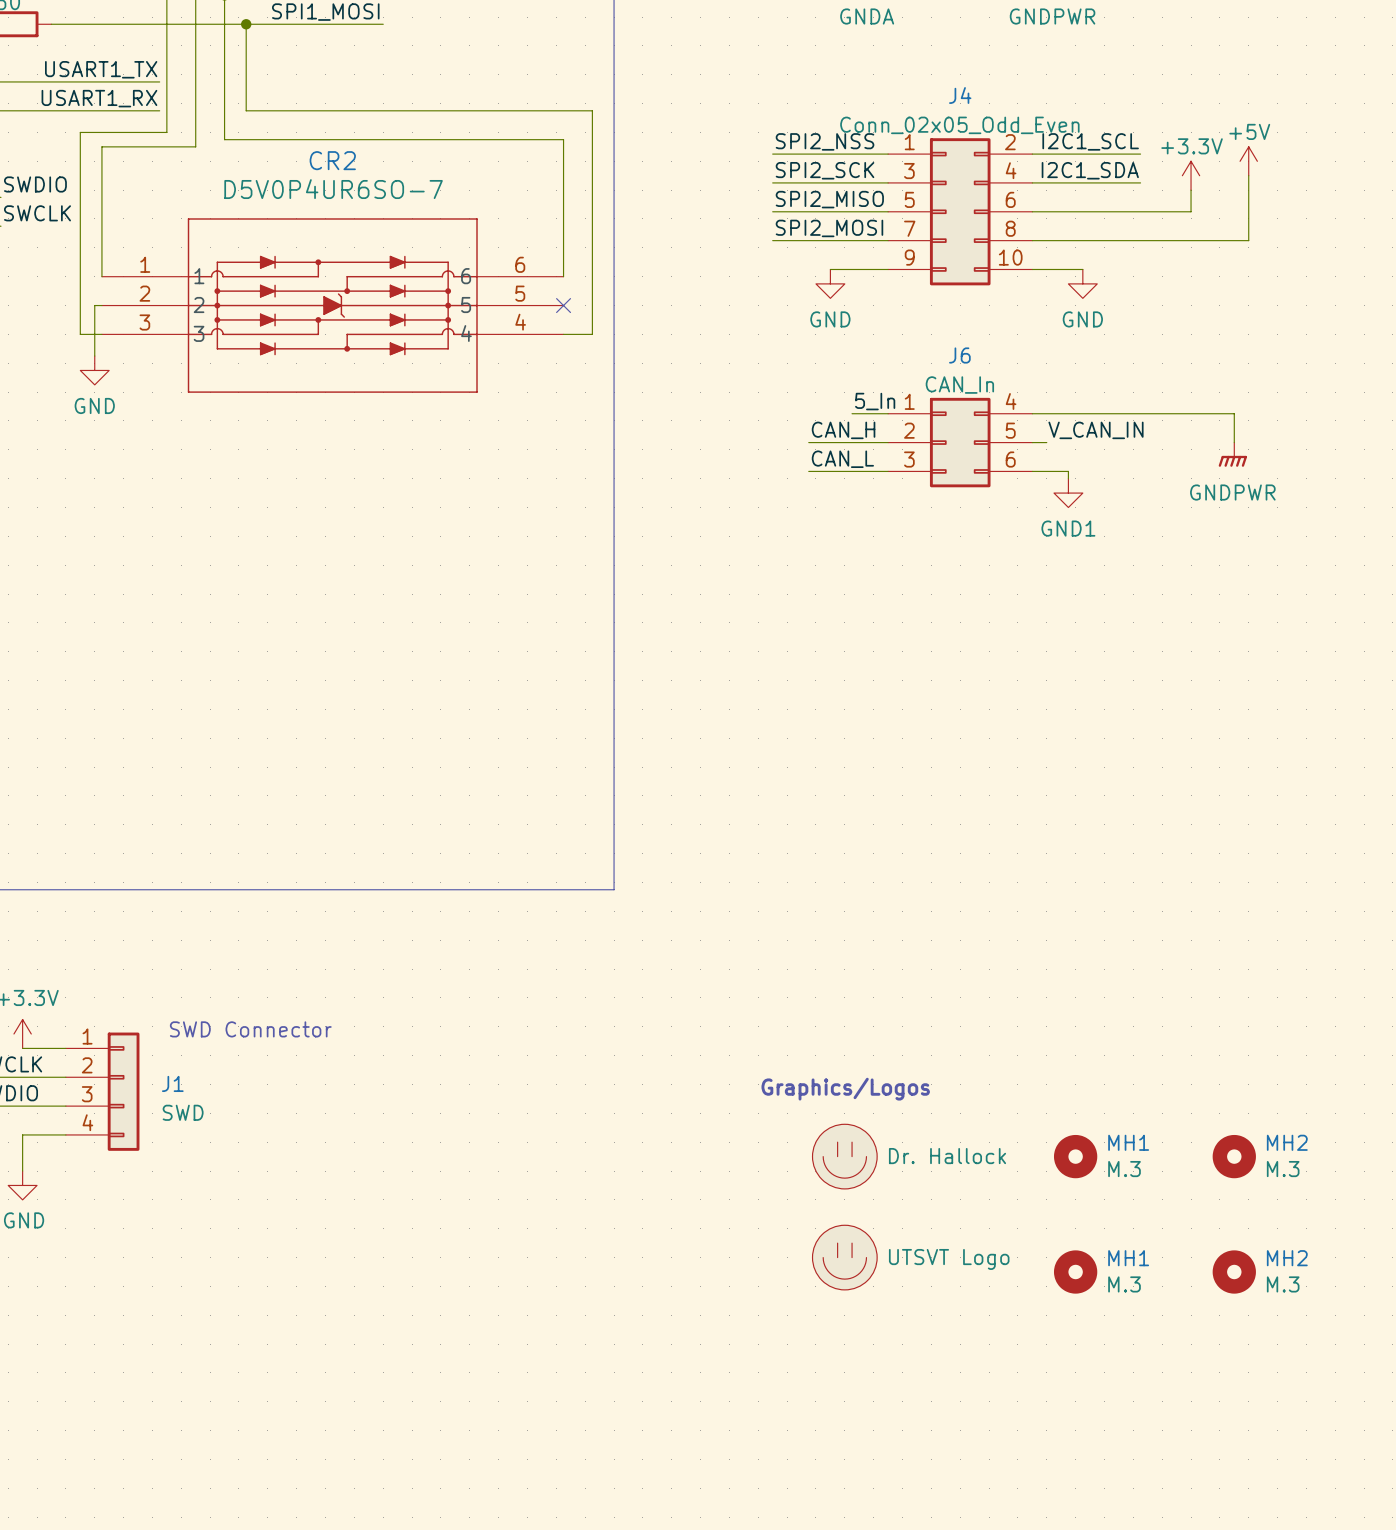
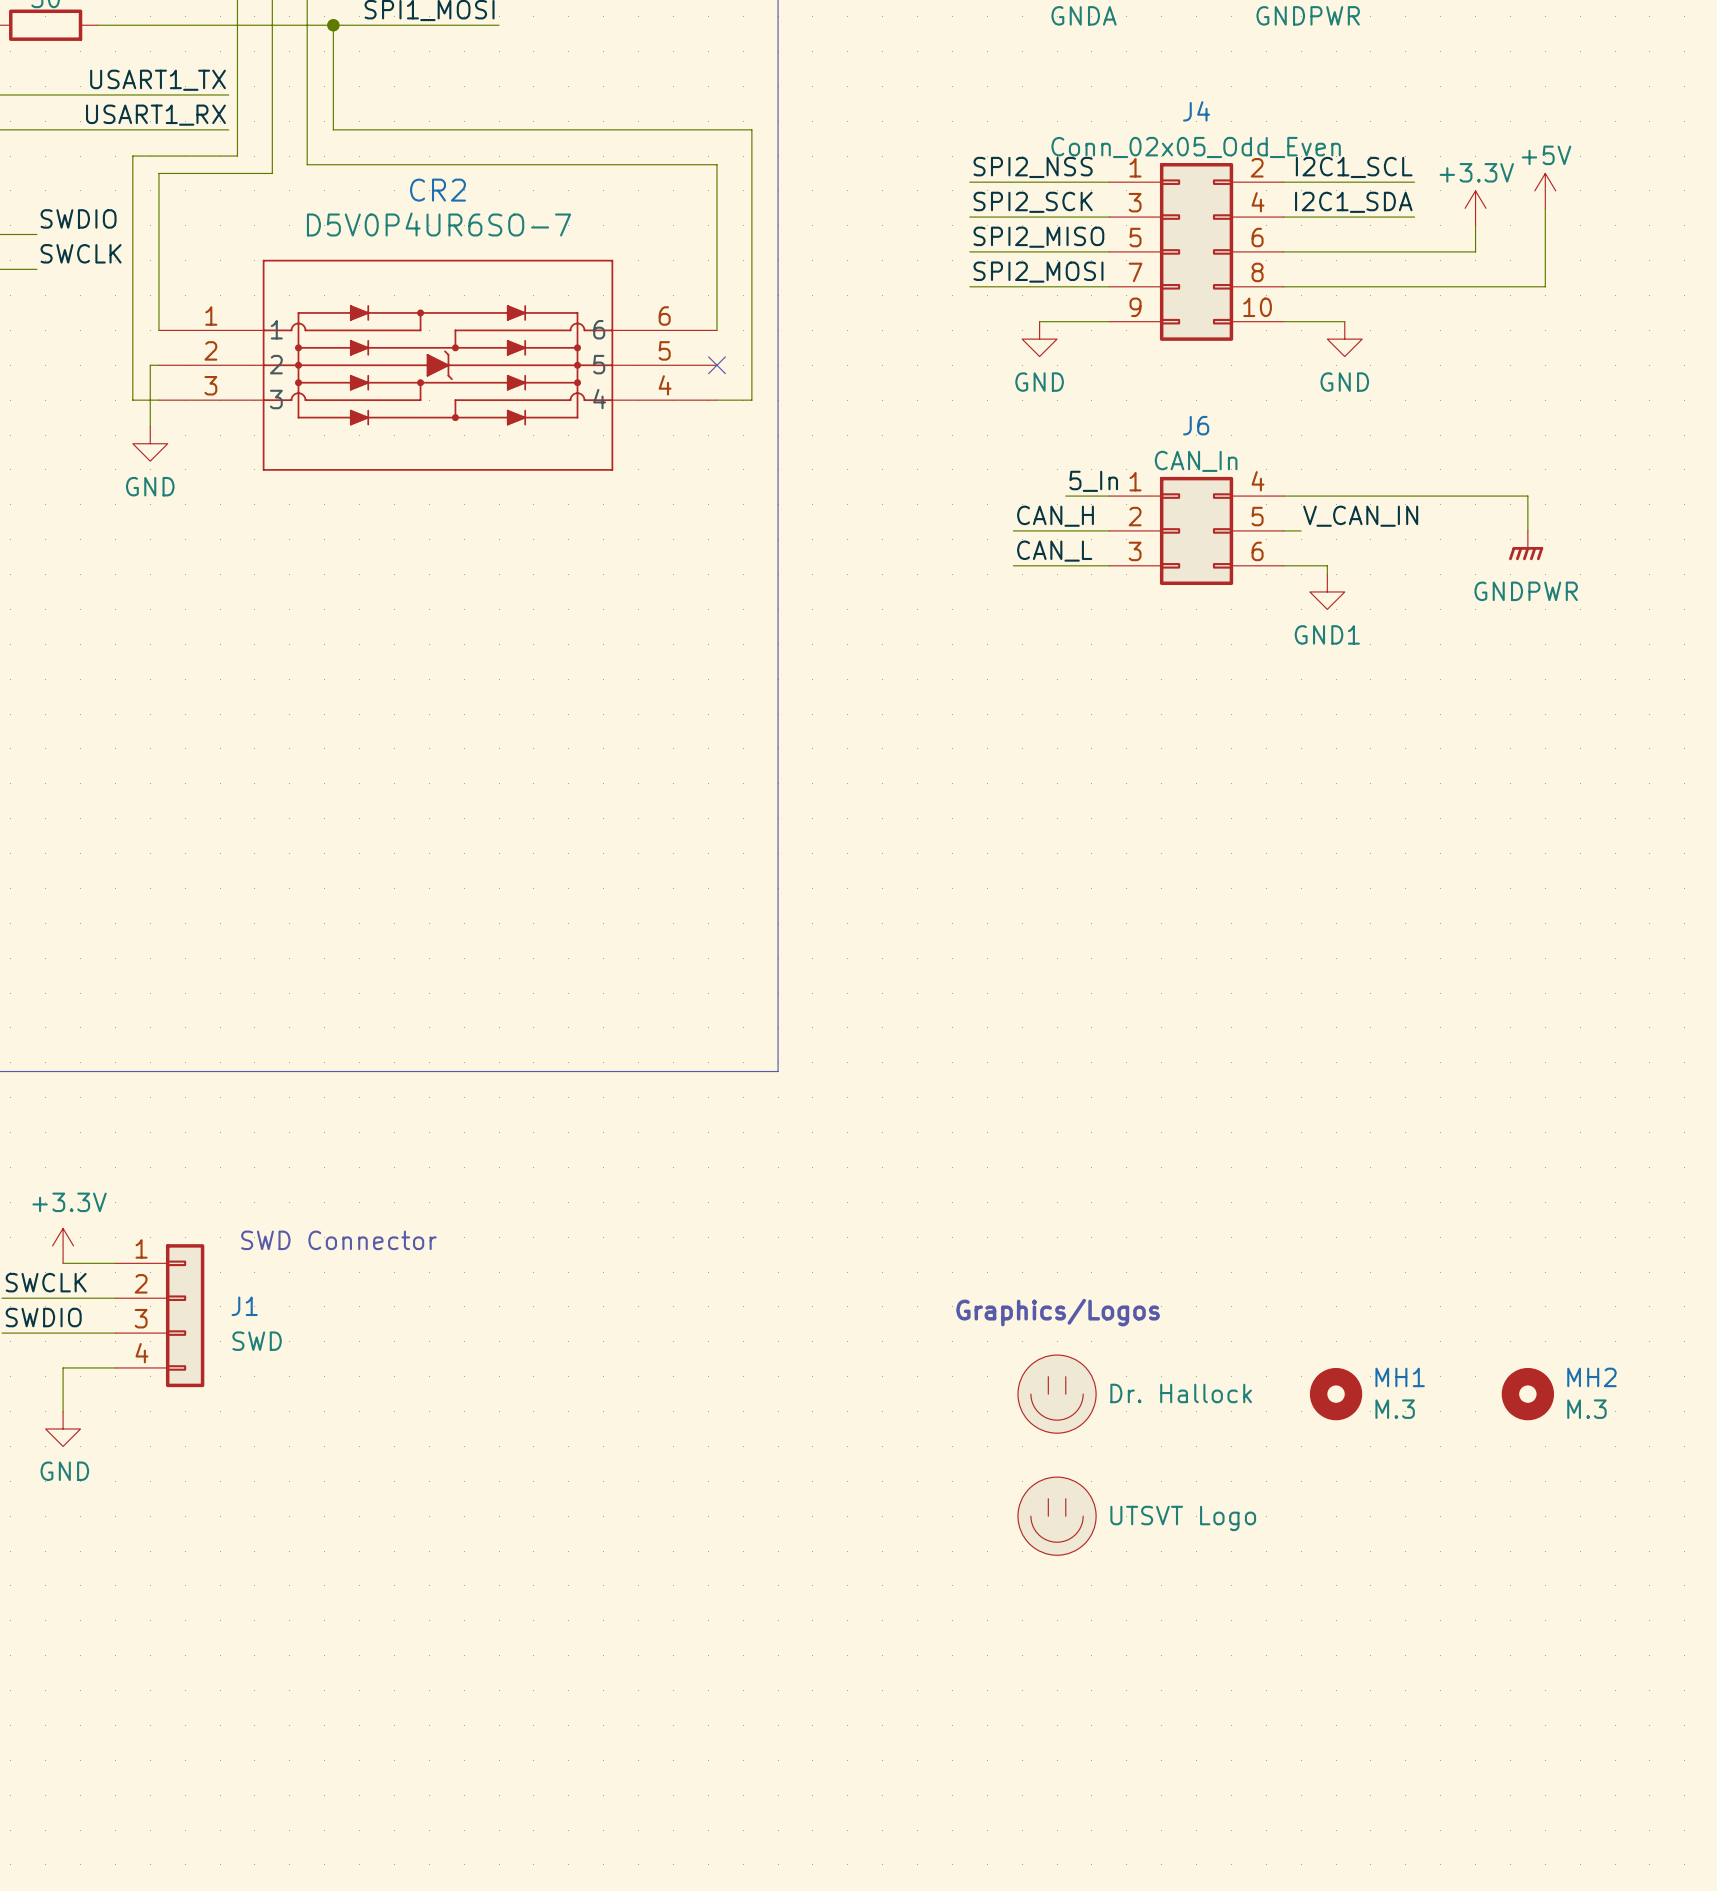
MH1: M.3 (1075, 1272) -> none
MH2: M.3 (1234, 1272) -> none

